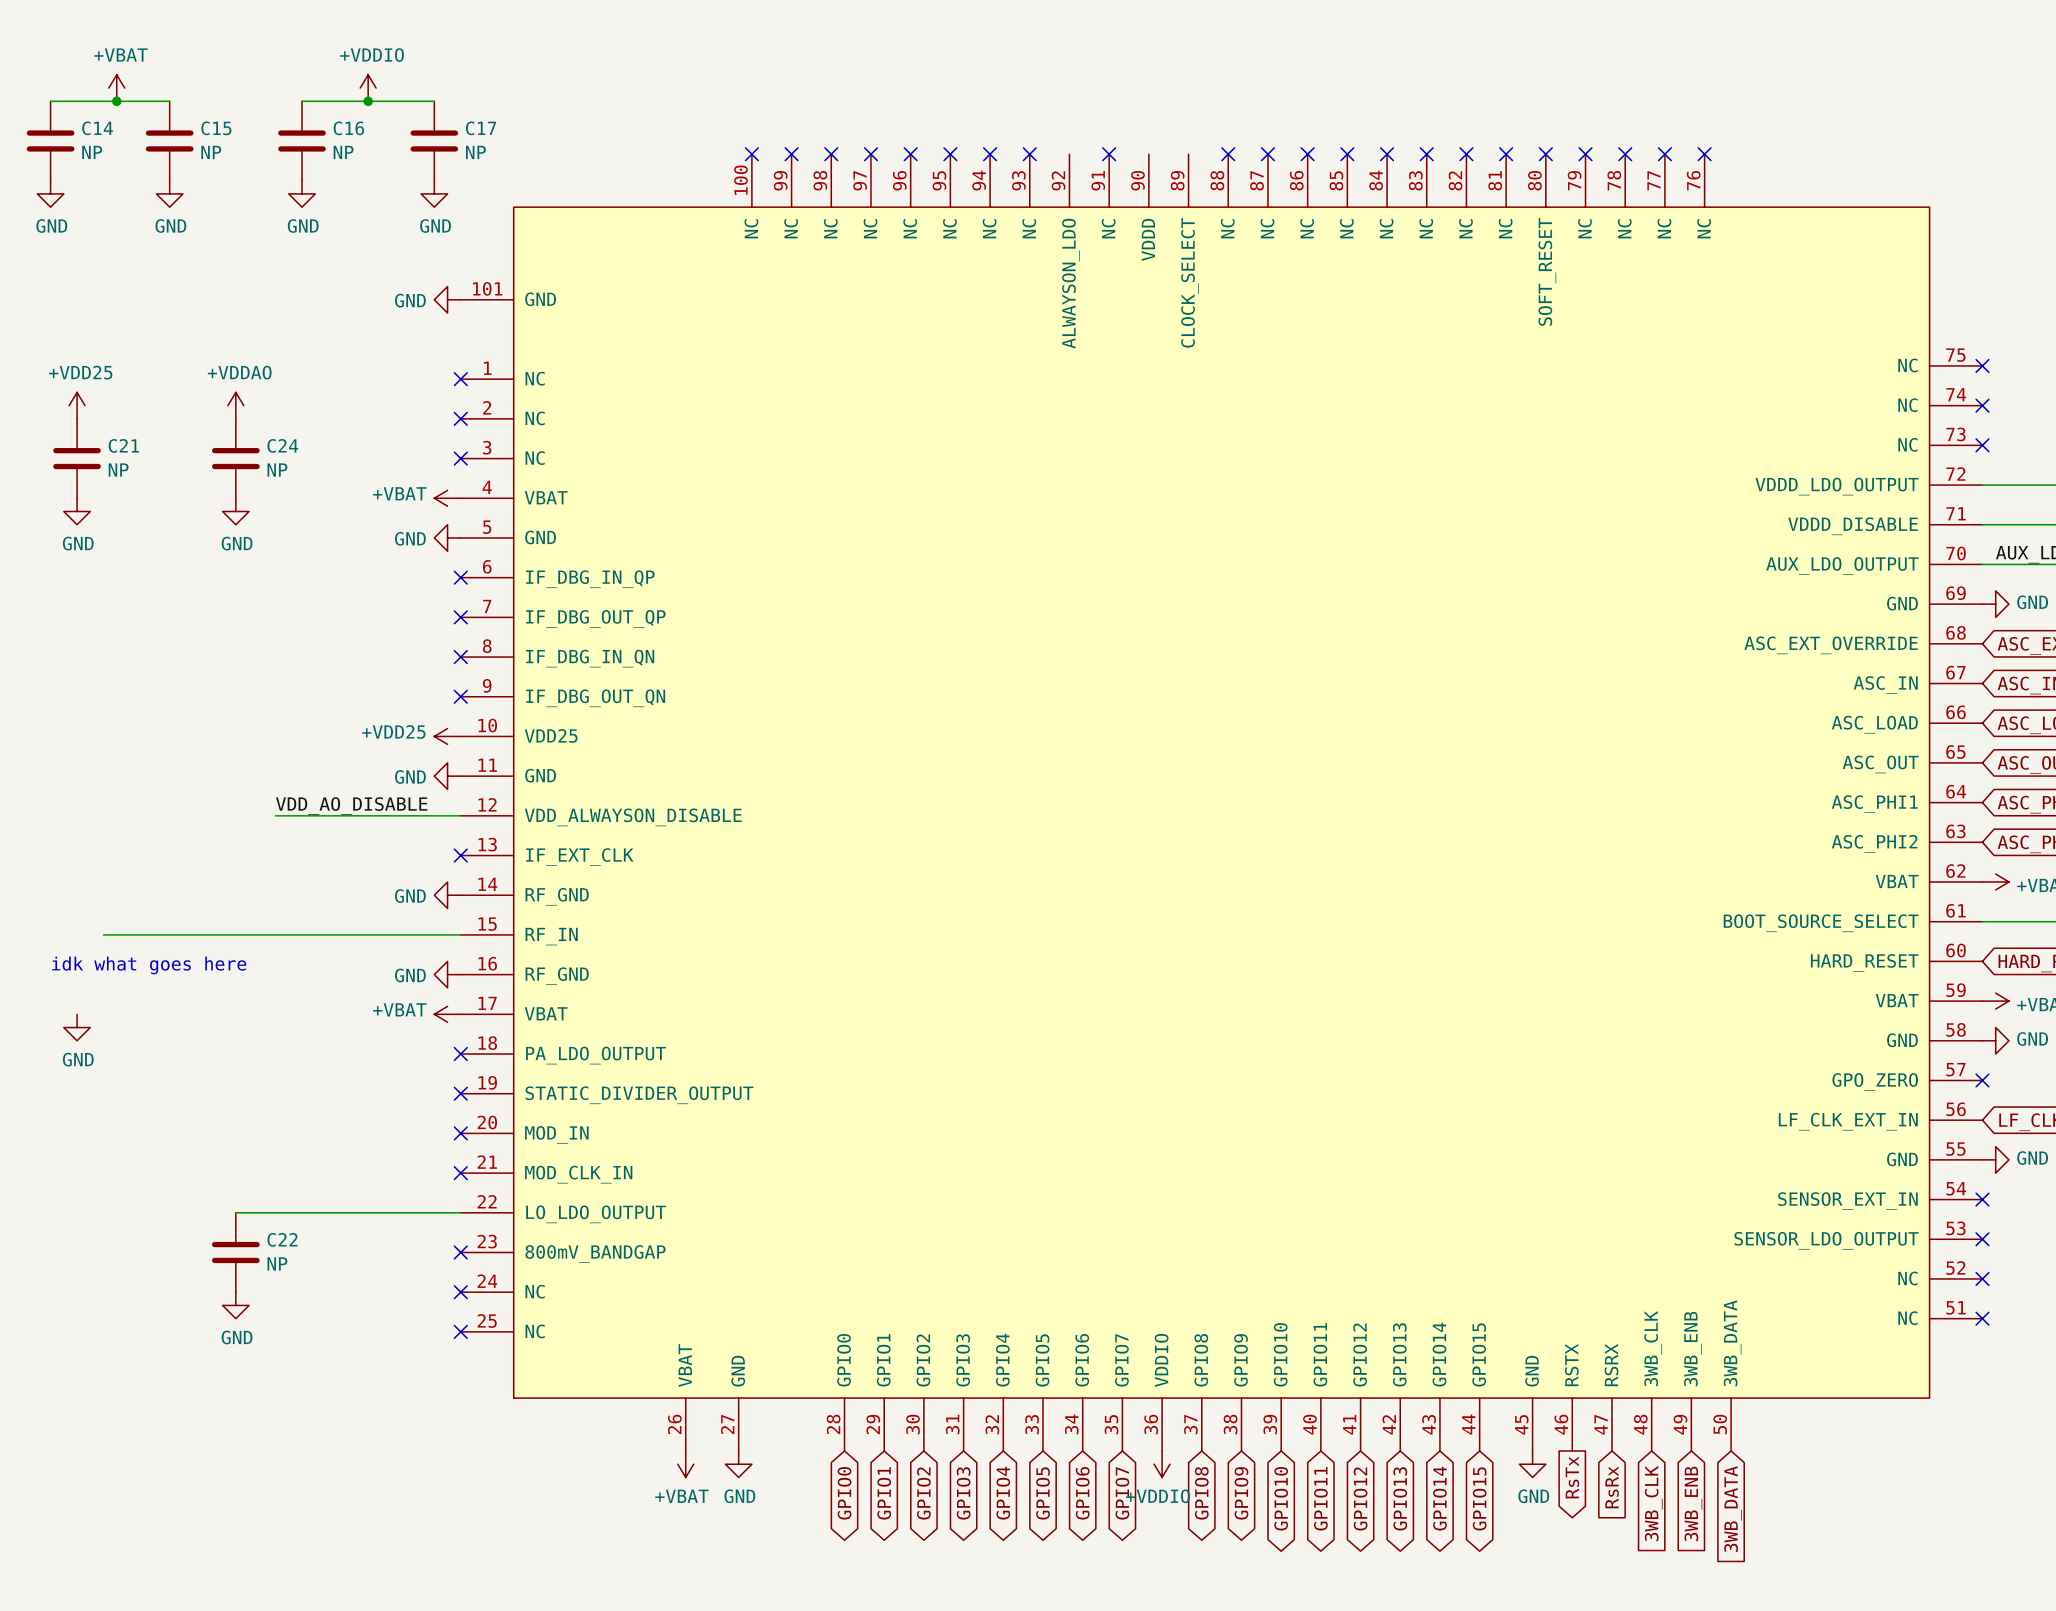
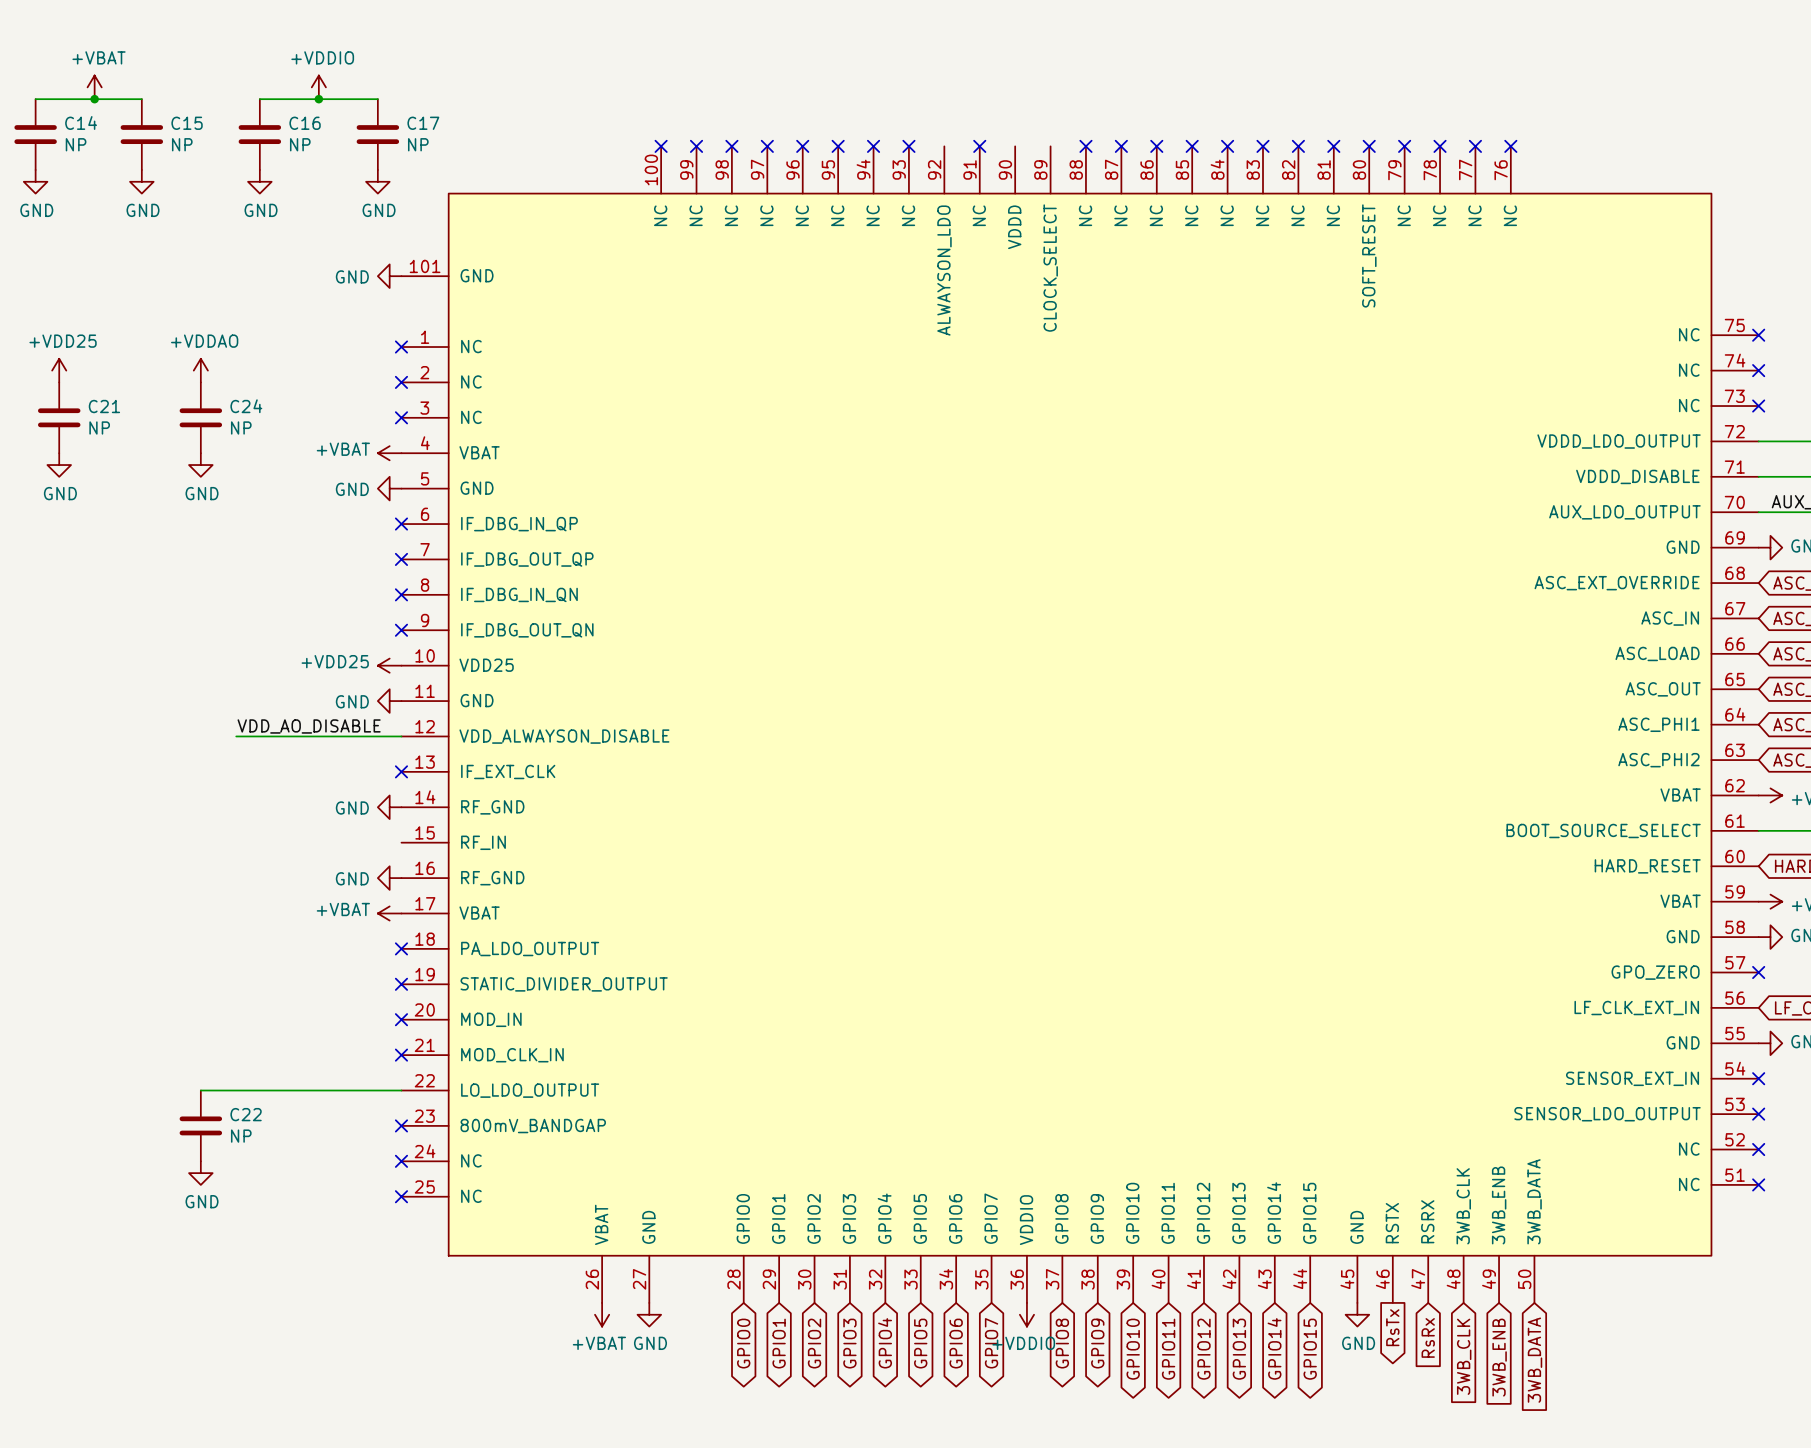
wire: (103, 934) (460, 934) -> none
text: idk what goes here (149, 965) -> none
power symbol: GND (77, 1027) -> none

